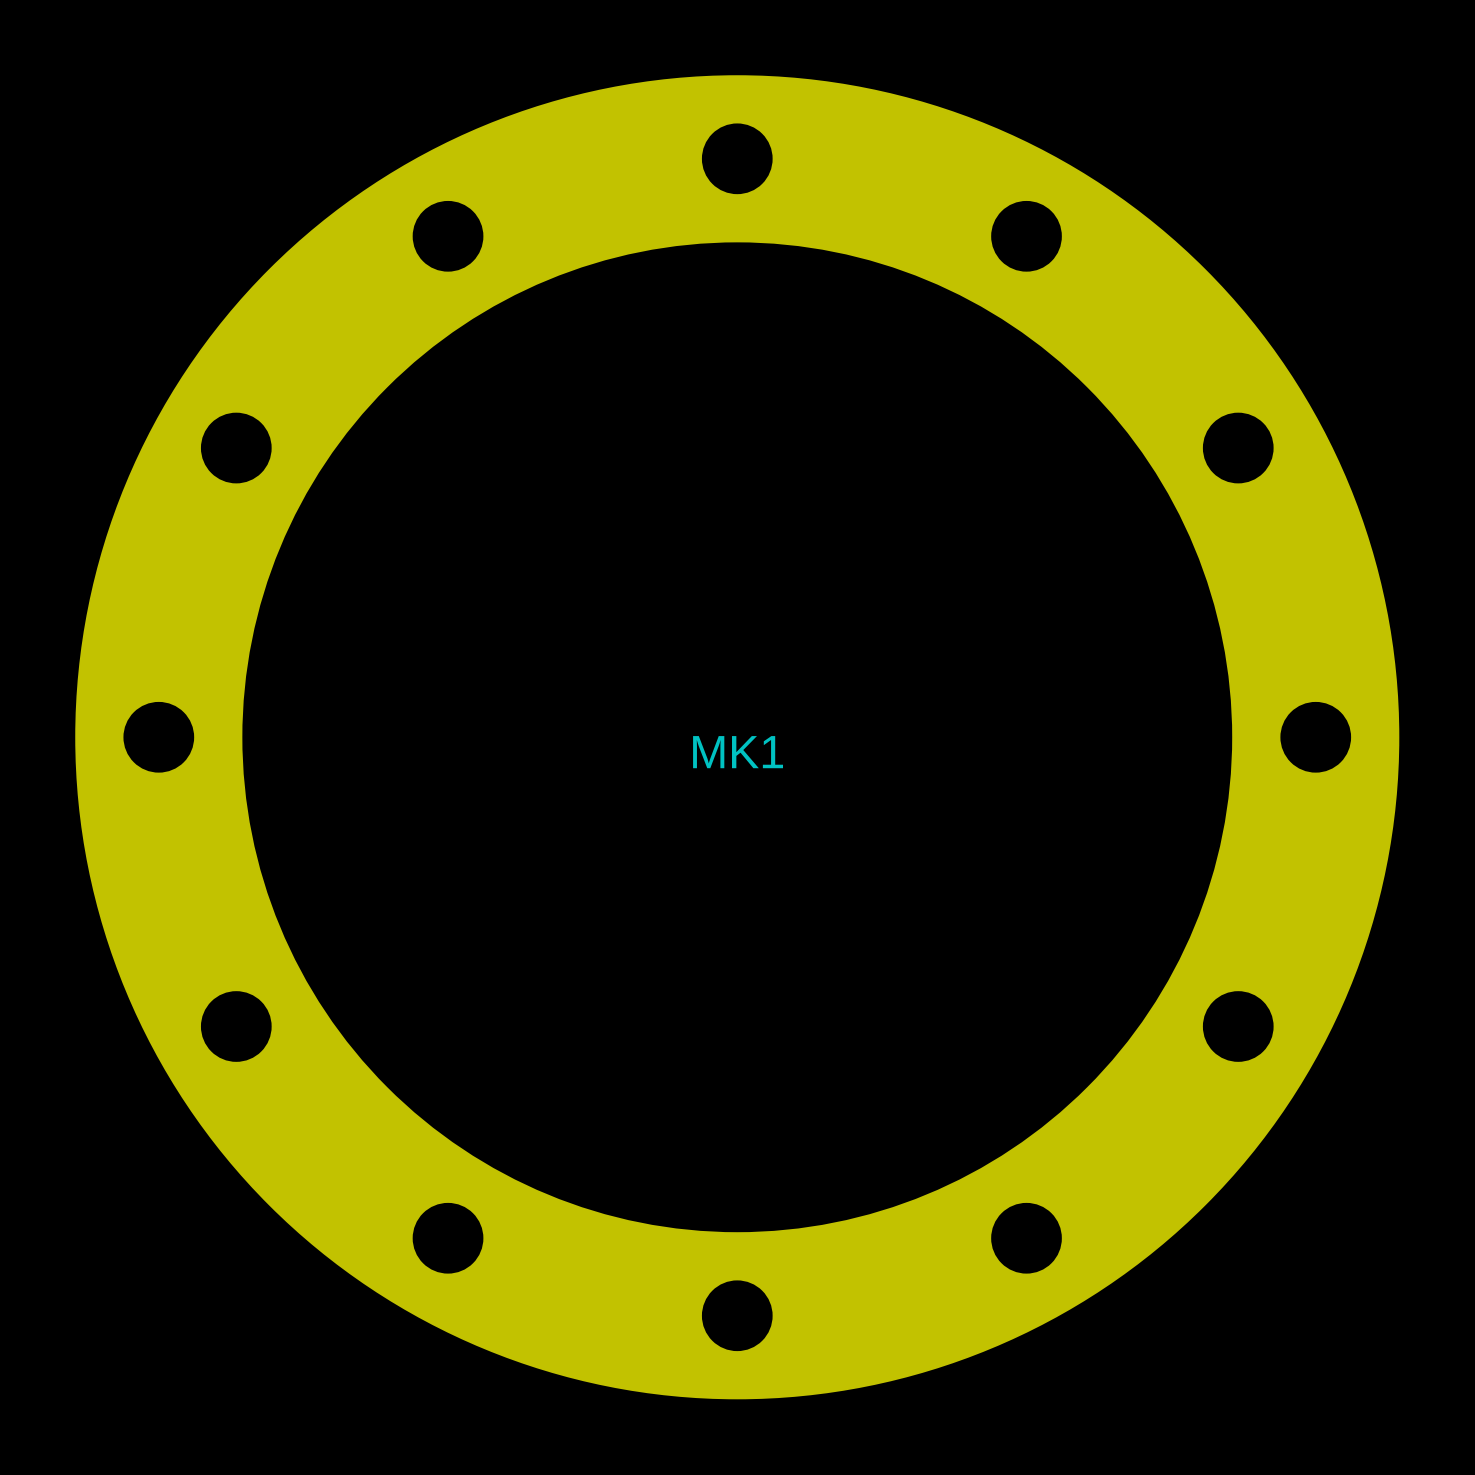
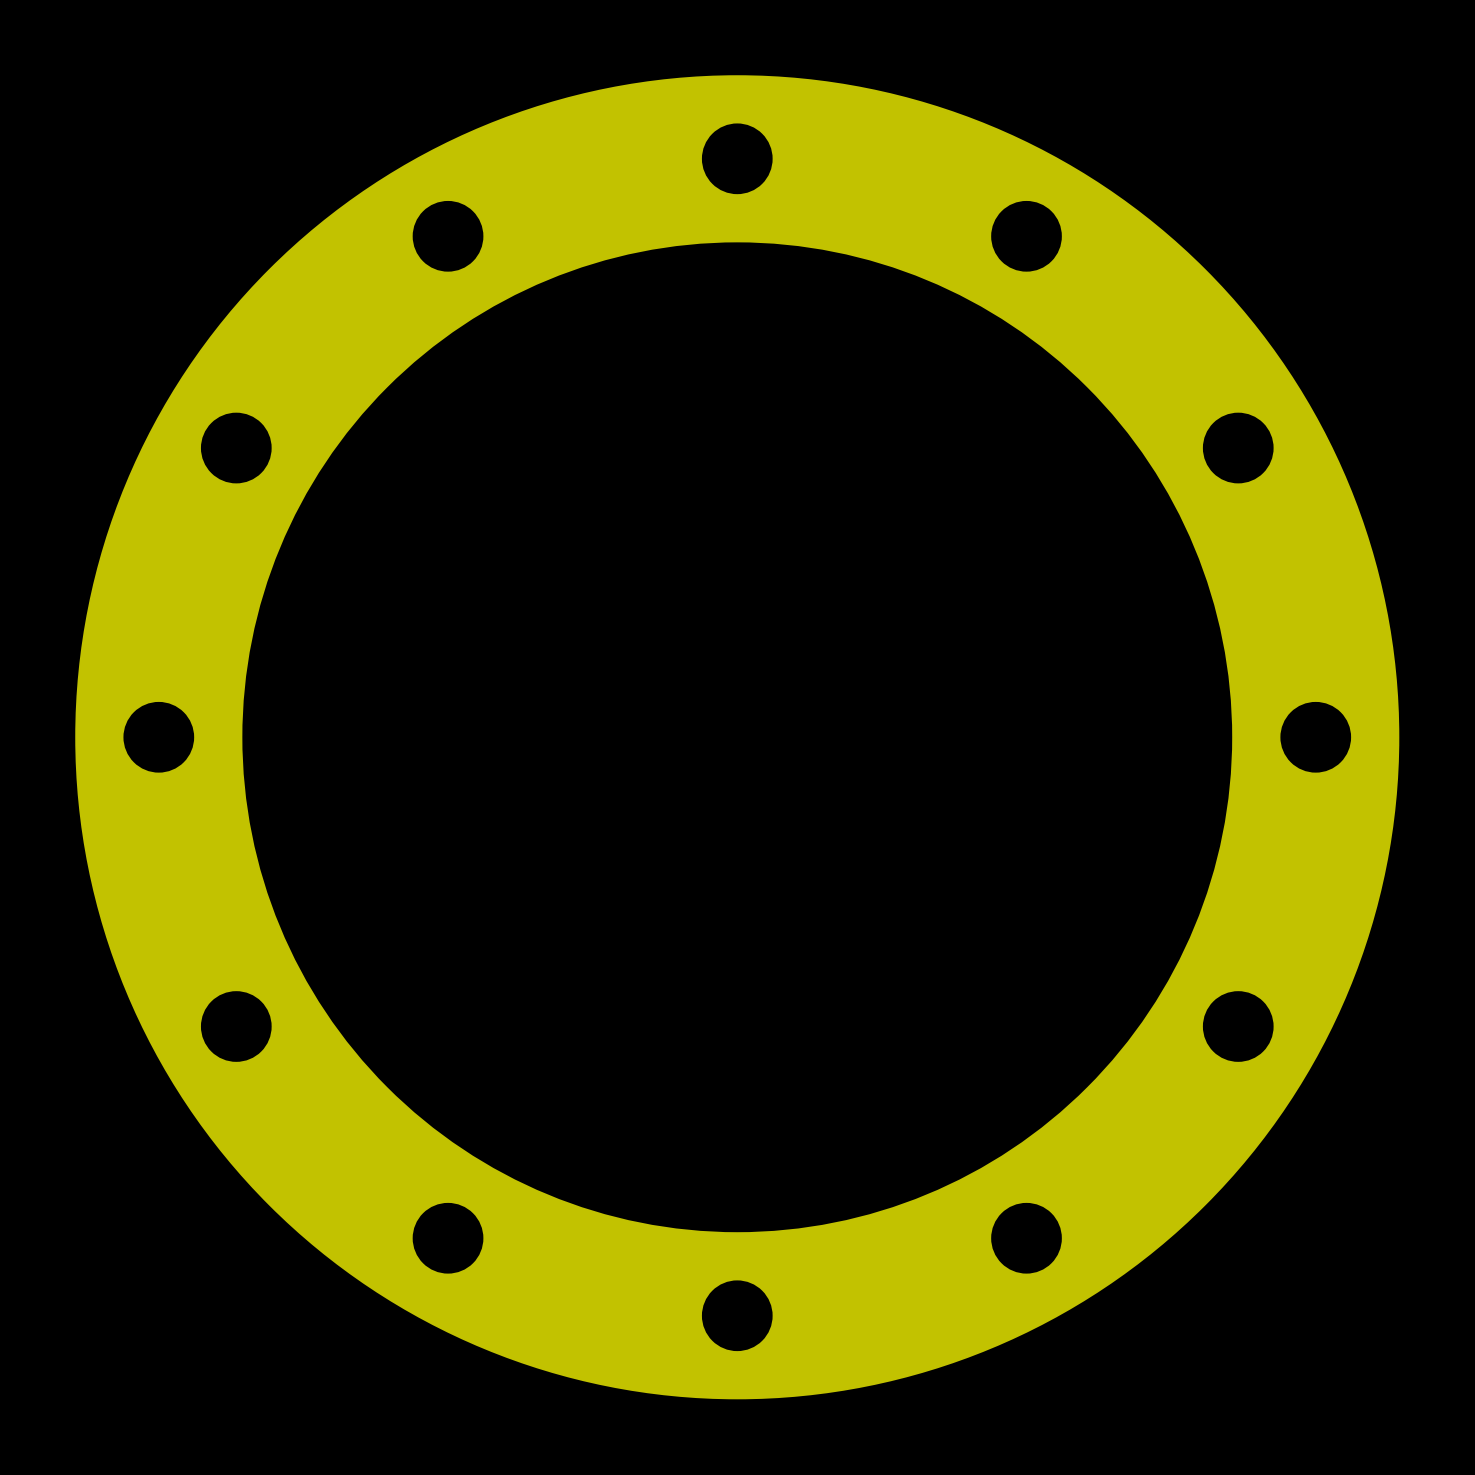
MK1 name: MK1 (738, 752) -> none

